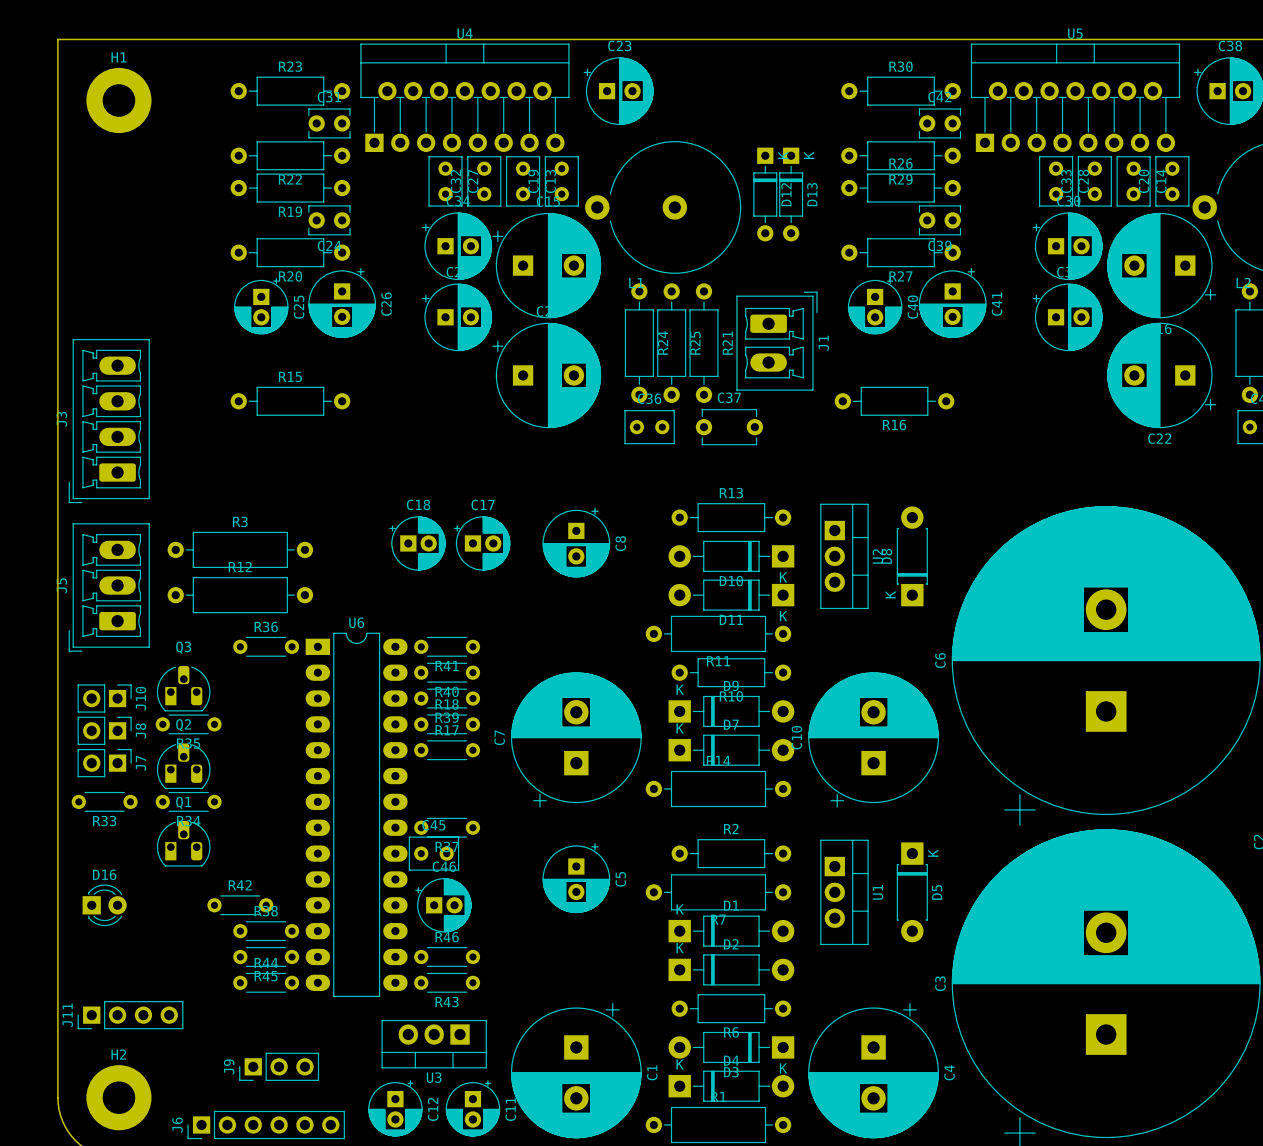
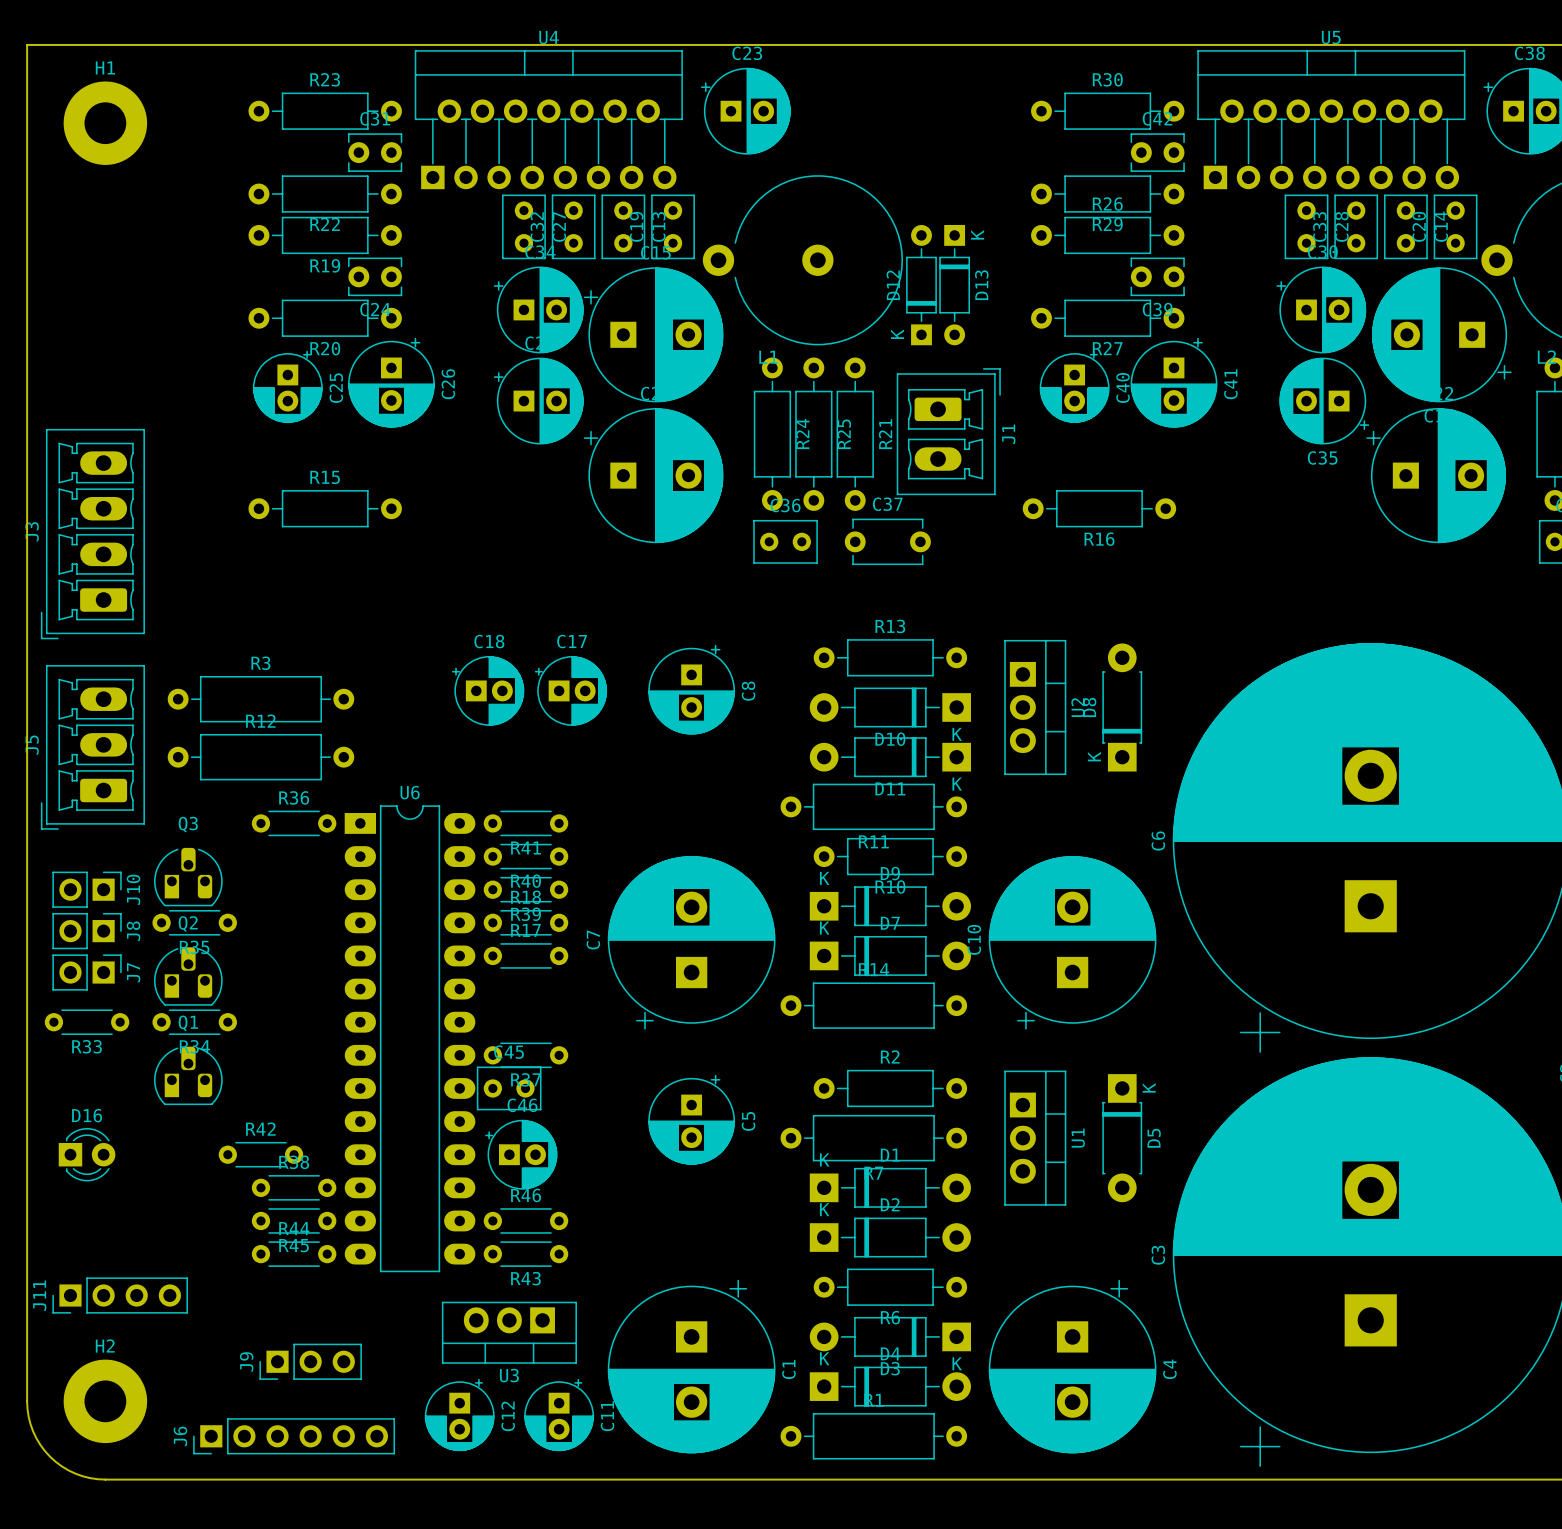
D12 rotation: 0° (765, 194) -> 180° (921, 285)
D13 position: (791, 194) -> (954, 285)
C35 rotation: 0° (1067, 317) -> 180° (1324, 401)
C22 rotation: 0° (1161, 375) -> 180° (1436, 475)

